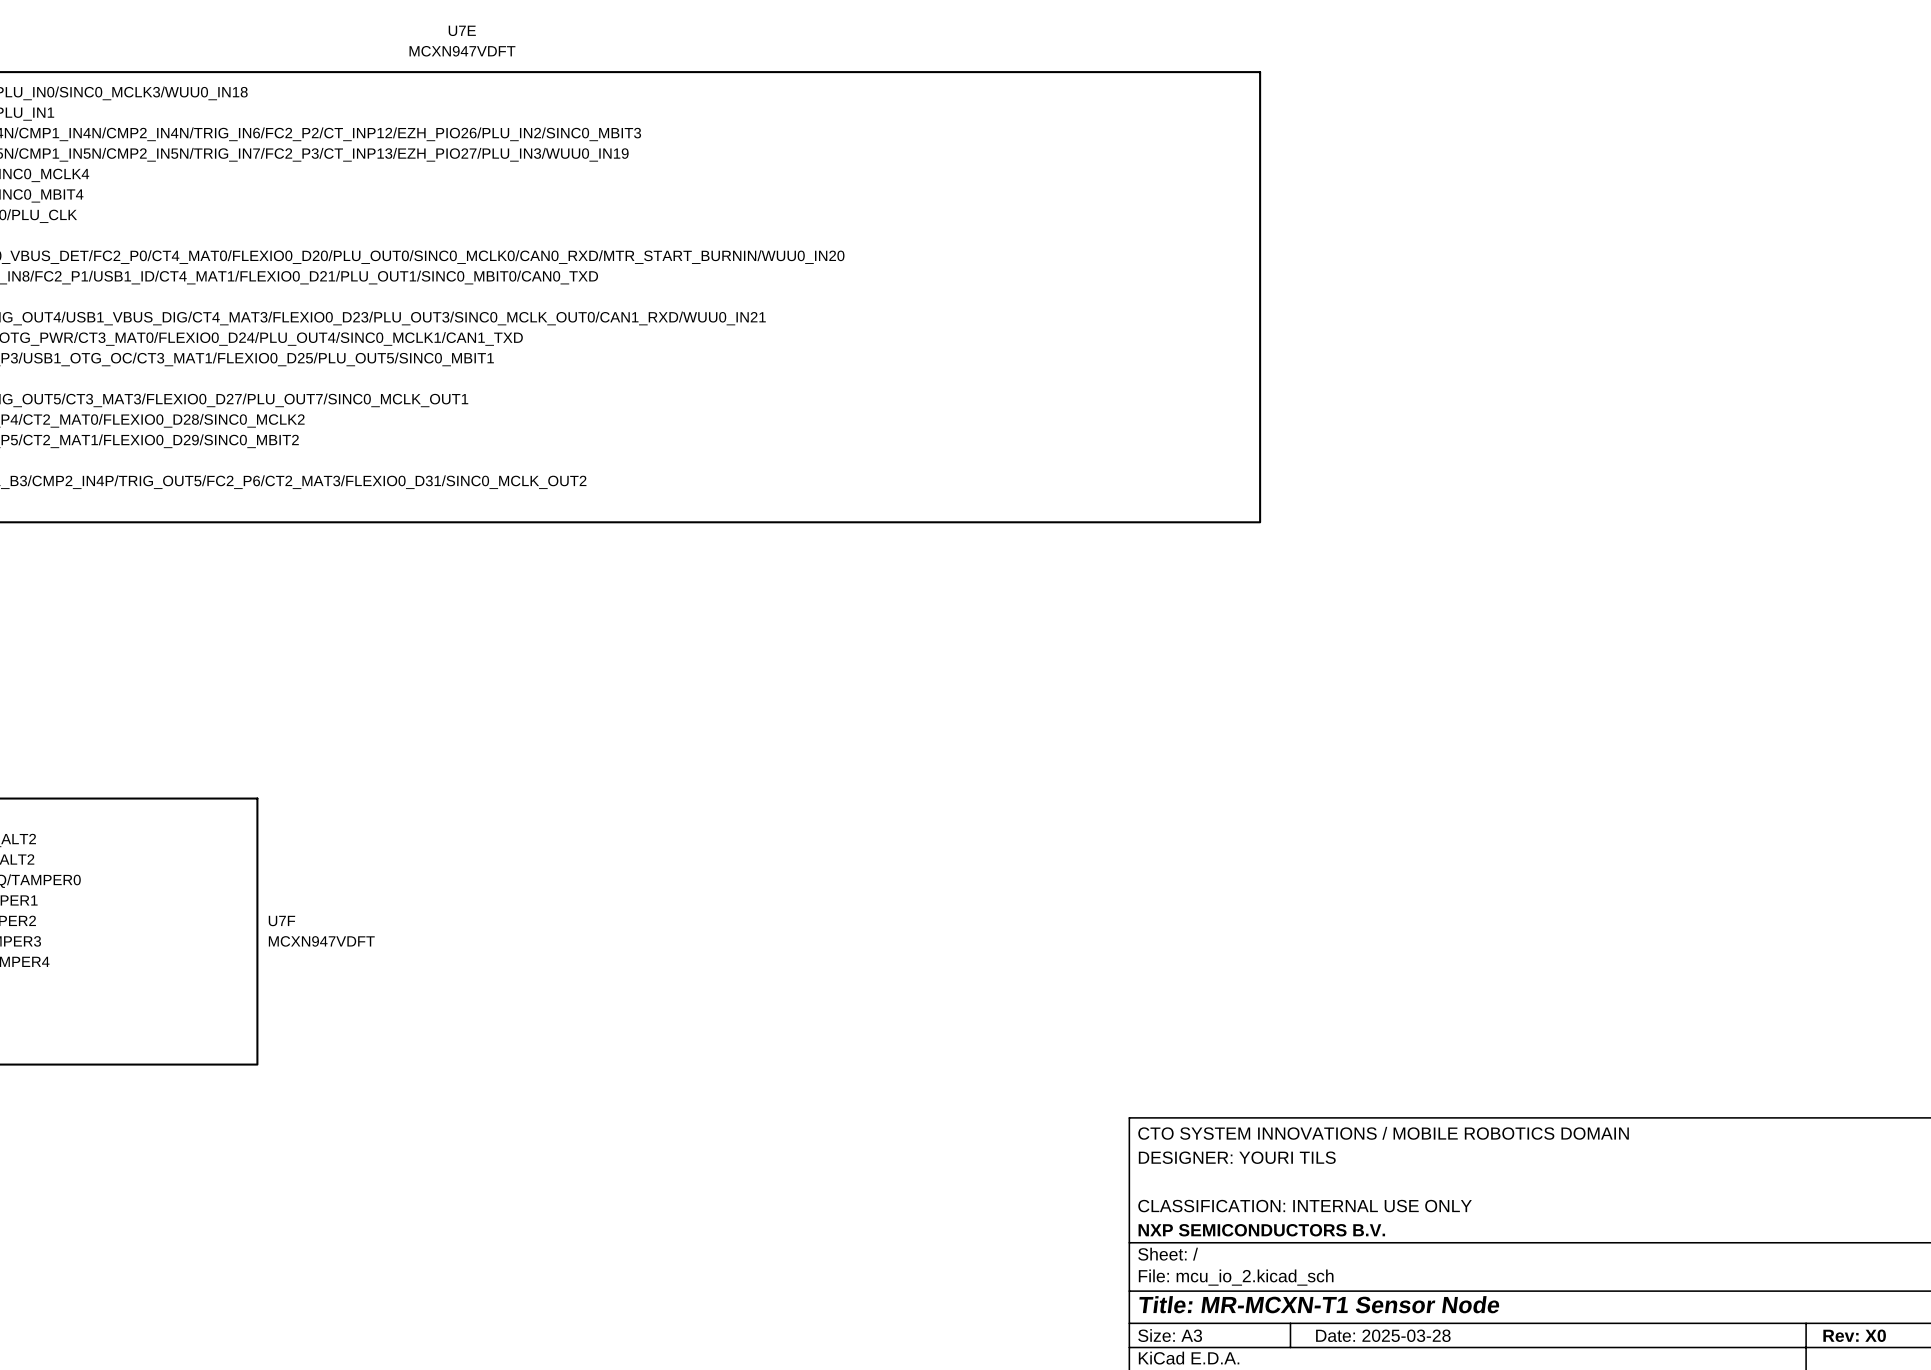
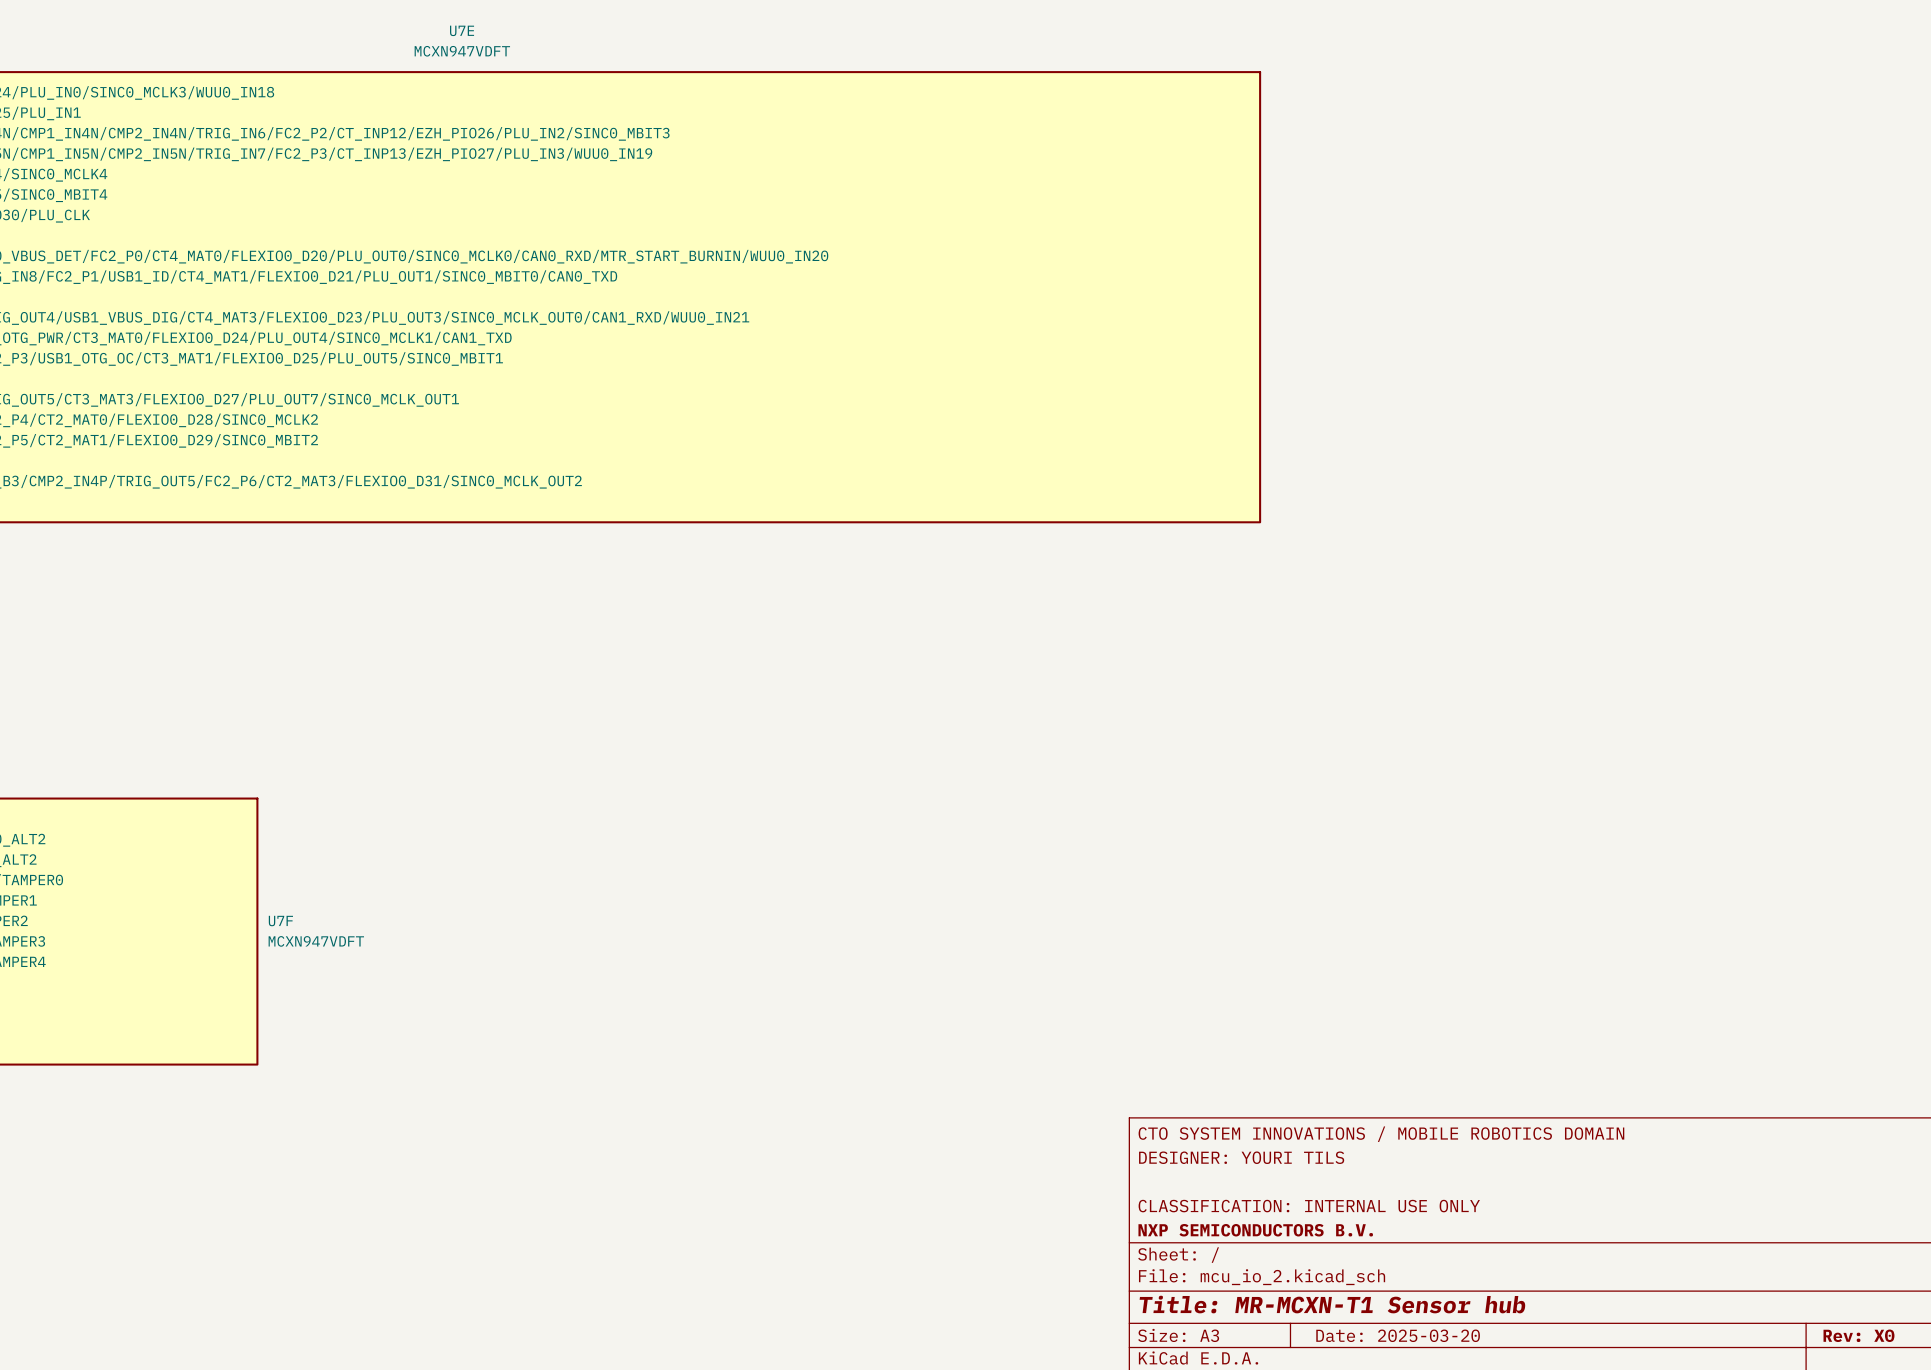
title block: Title: MR-MCXN-T1 Sensor Node (1319, 1304) -> Title: MR-MCXN-T1 Sensor hub (1332, 1304)
title block: Date: 2025-03-28 (1383, 1335) -> Date: 2025-03-20 (1398, 1335)

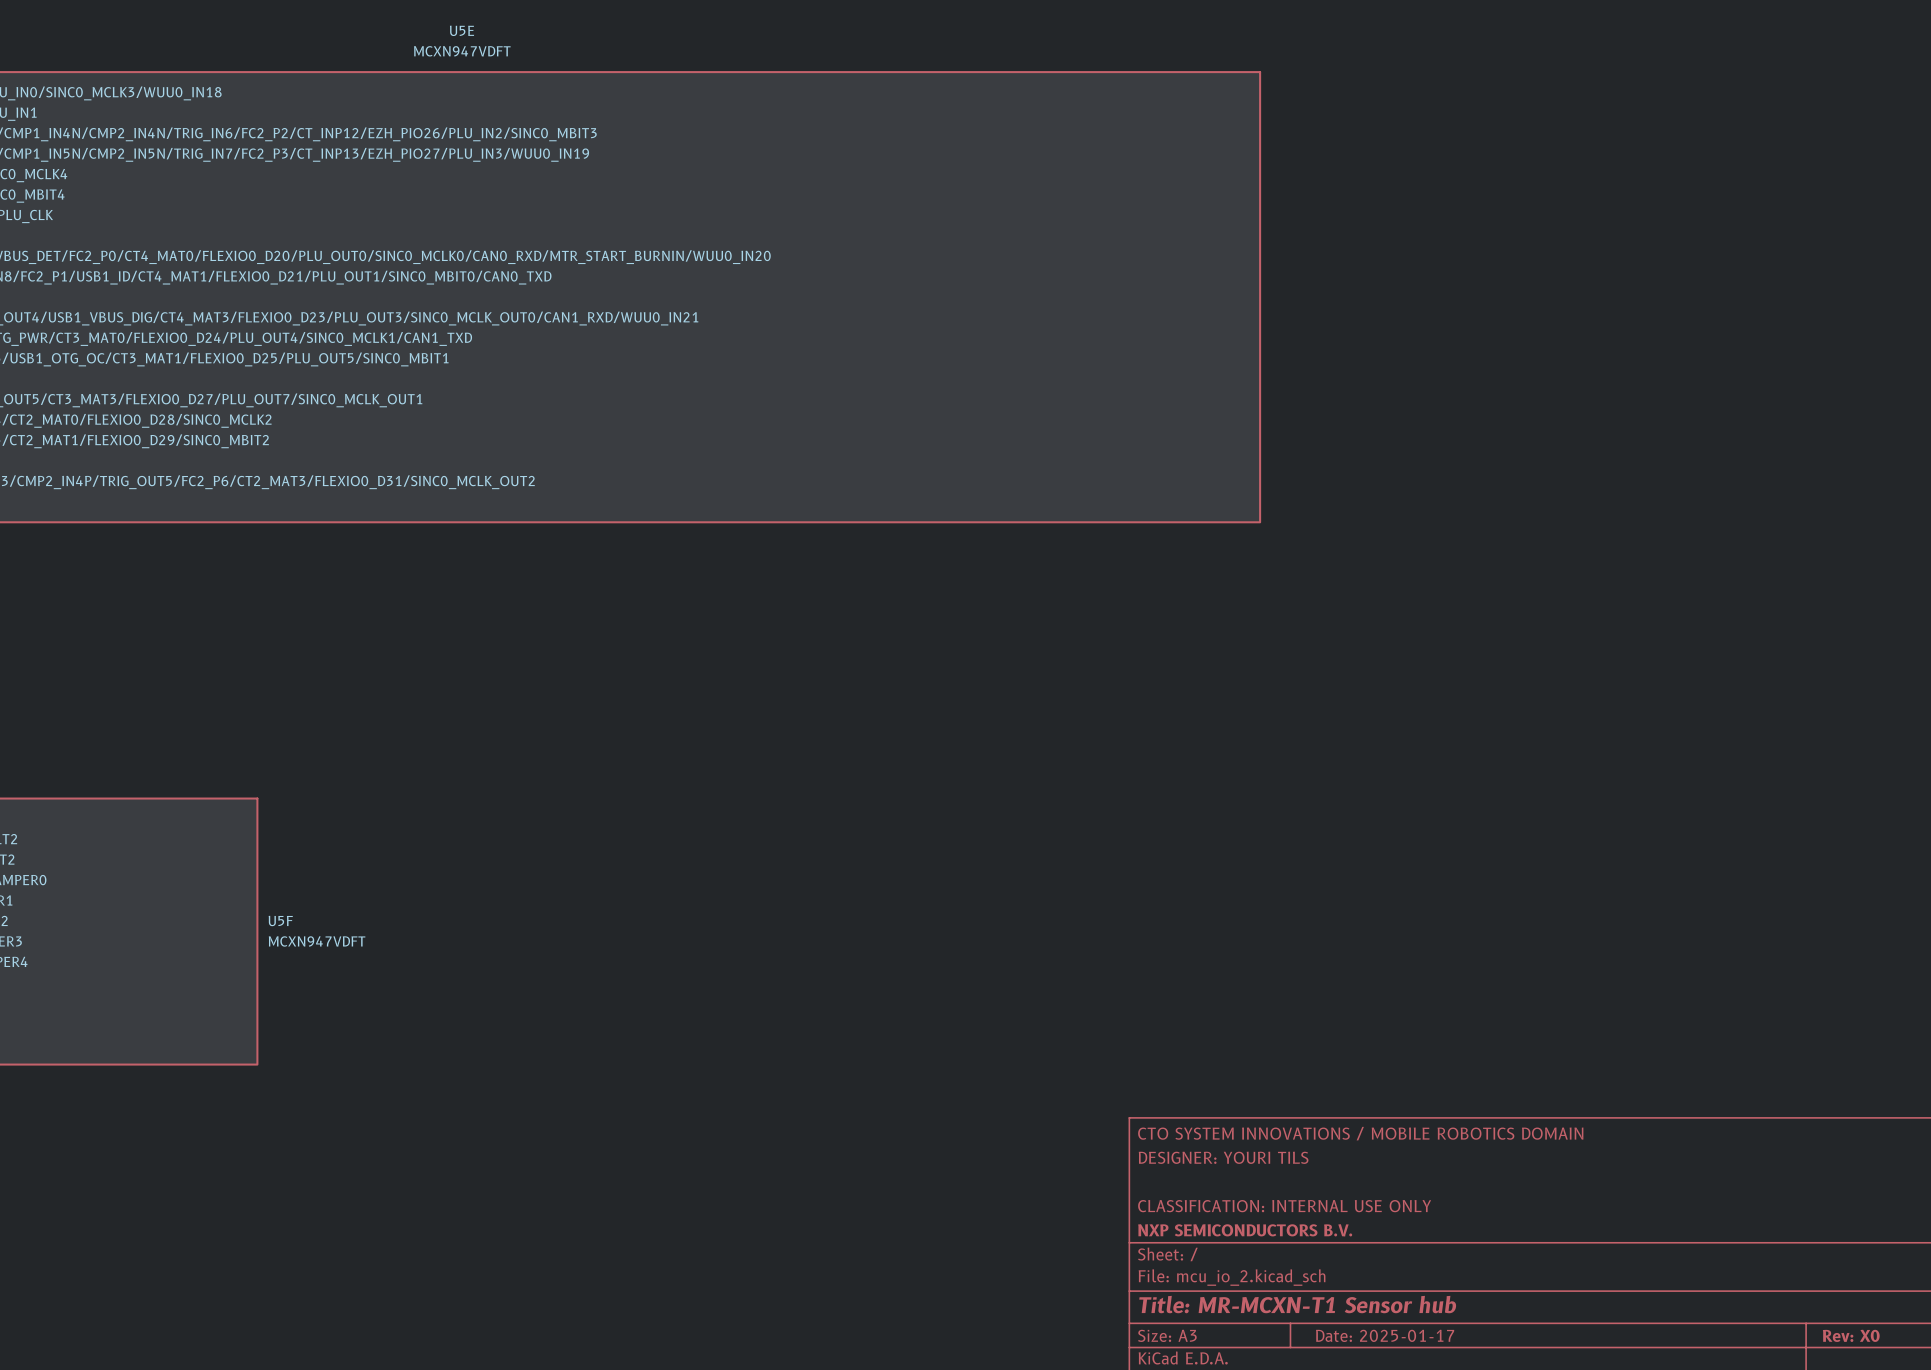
U7E name: U7E (462, 30) -> U5E (462, 30)
U7F name: U7F (280, 921) -> U5F (280, 920)
title block: Date: 2025-03-20 (1398, 1335) -> Date: 2025-01-17 (1385, 1335)

